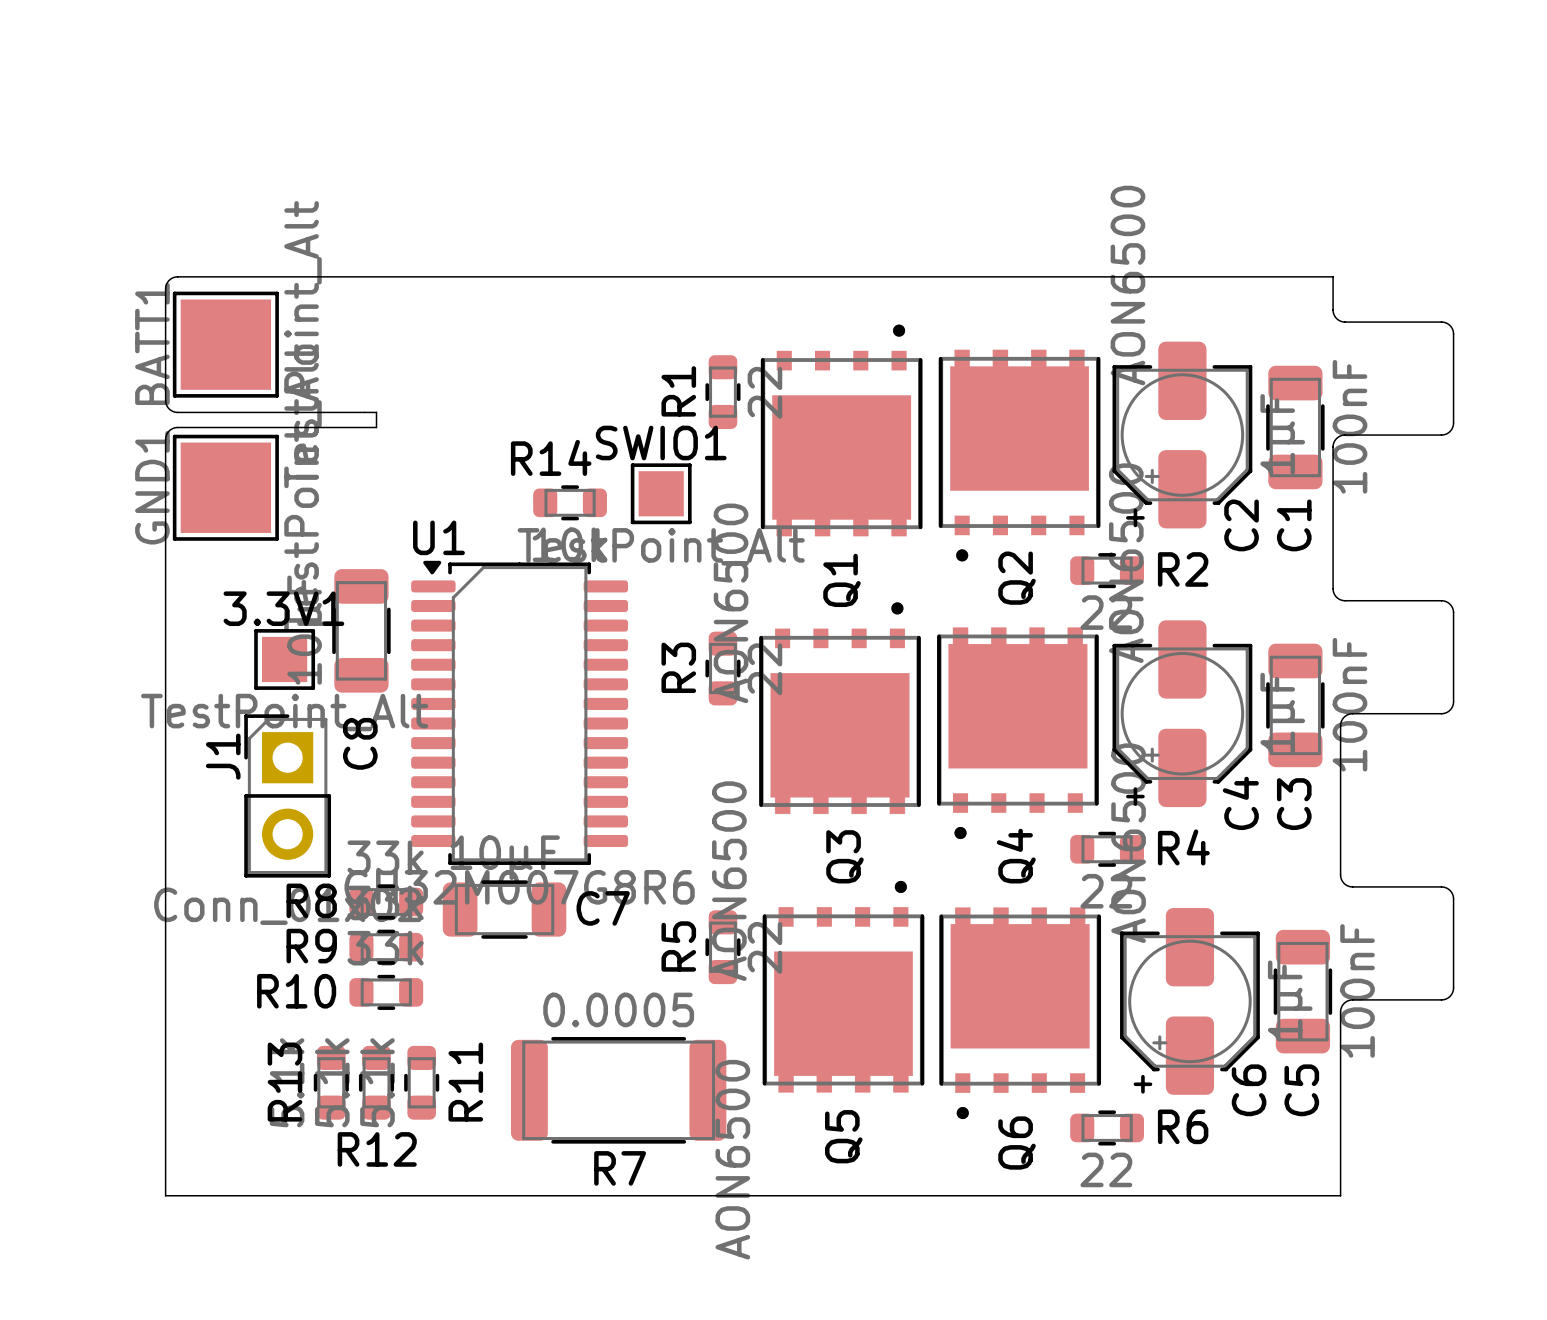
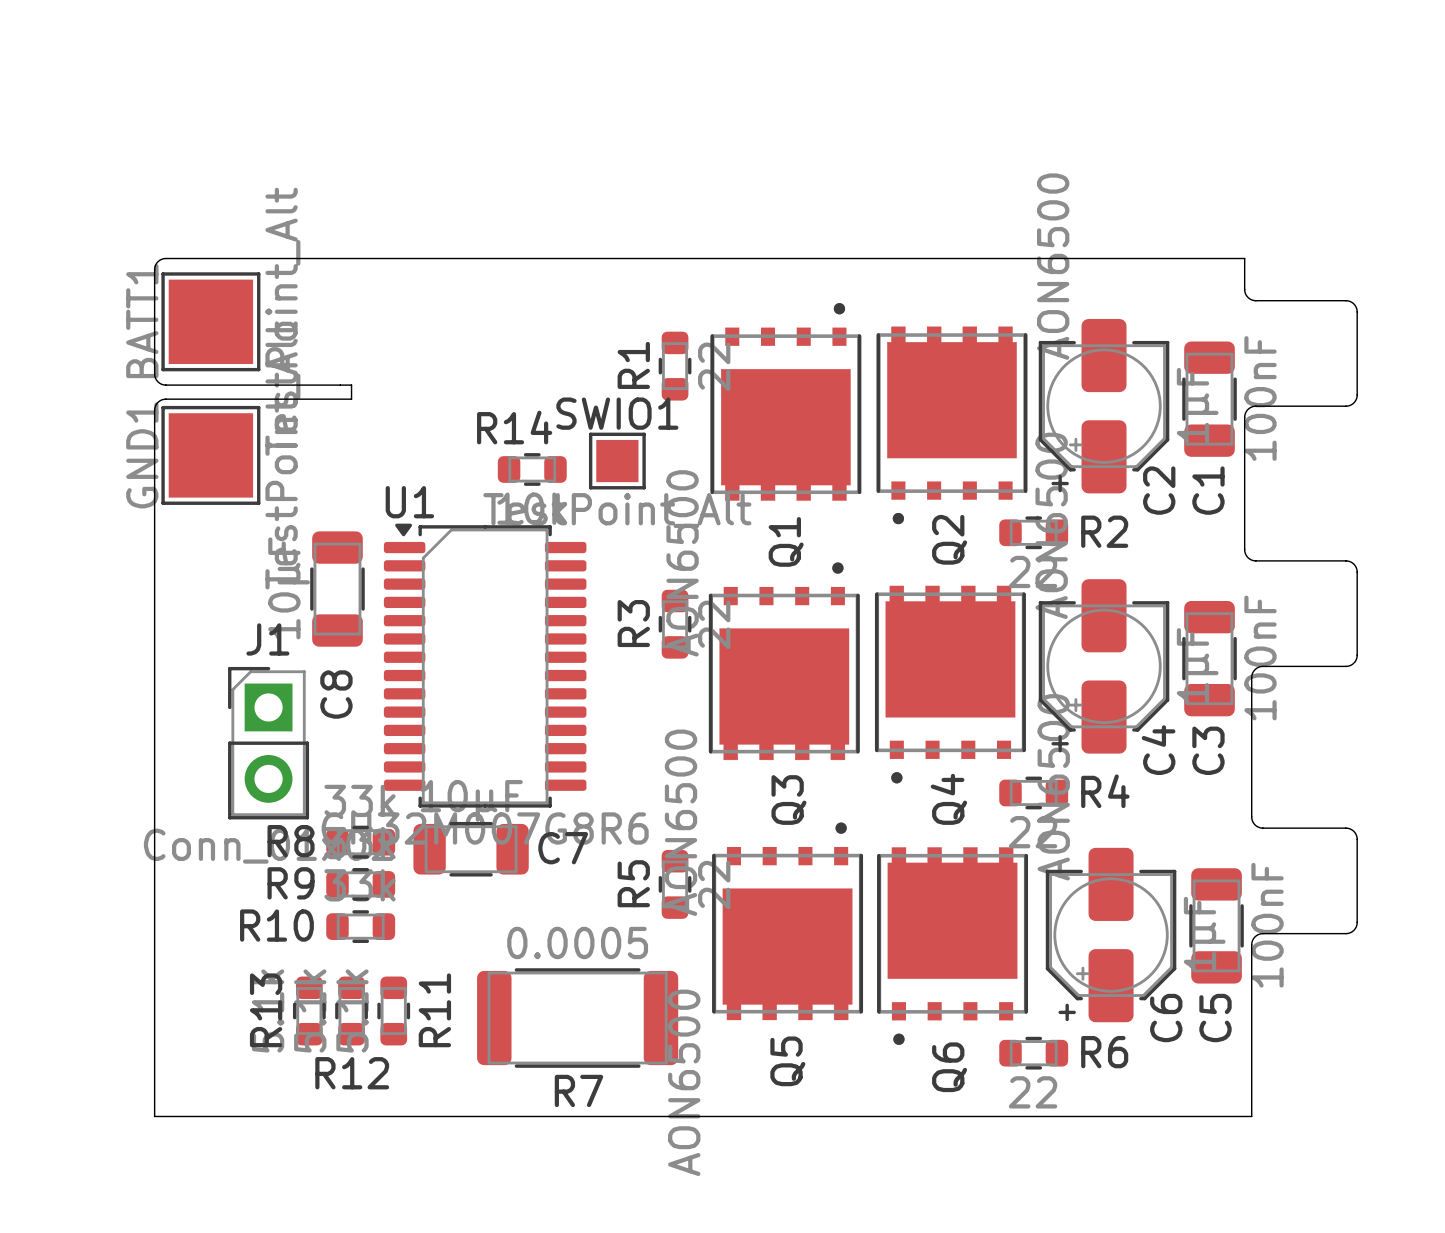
3.3V1: TestPoint_Alt (284, 659) -> none
J1 name rotation: 0° (223, 756) -> 90° clockwise (267, 639)
J1 name position: J1 (223, 756) -> J1 (267, 639)

